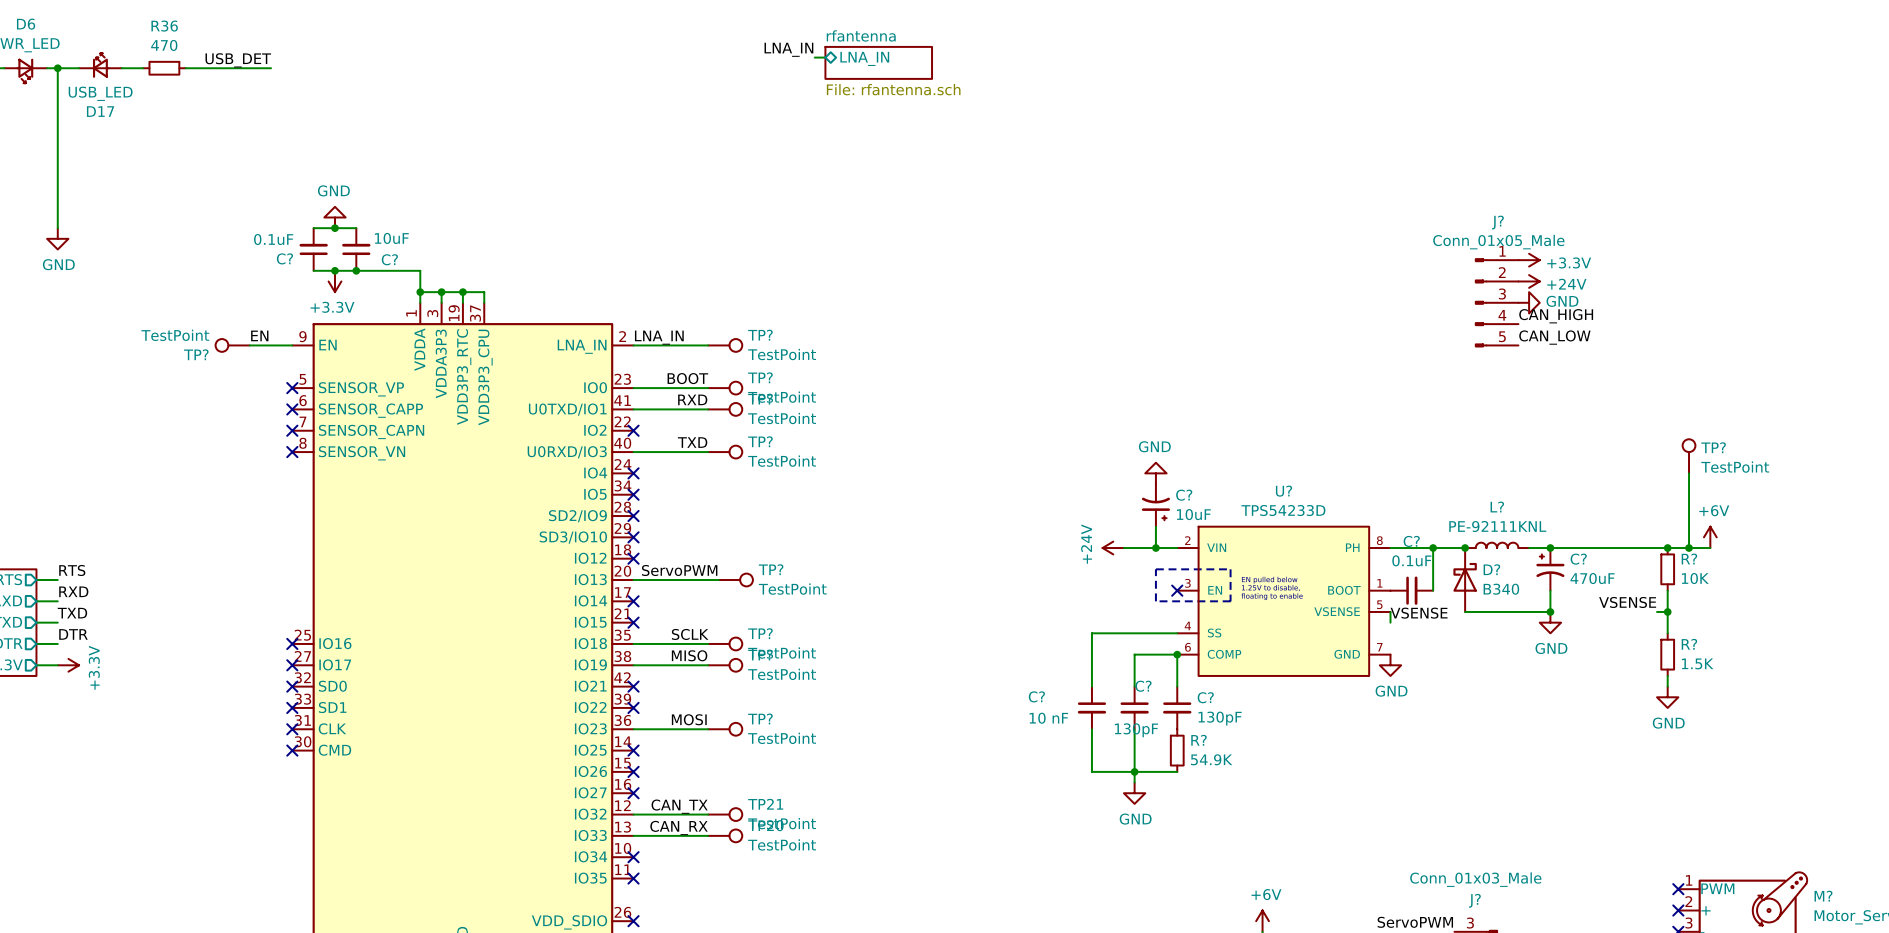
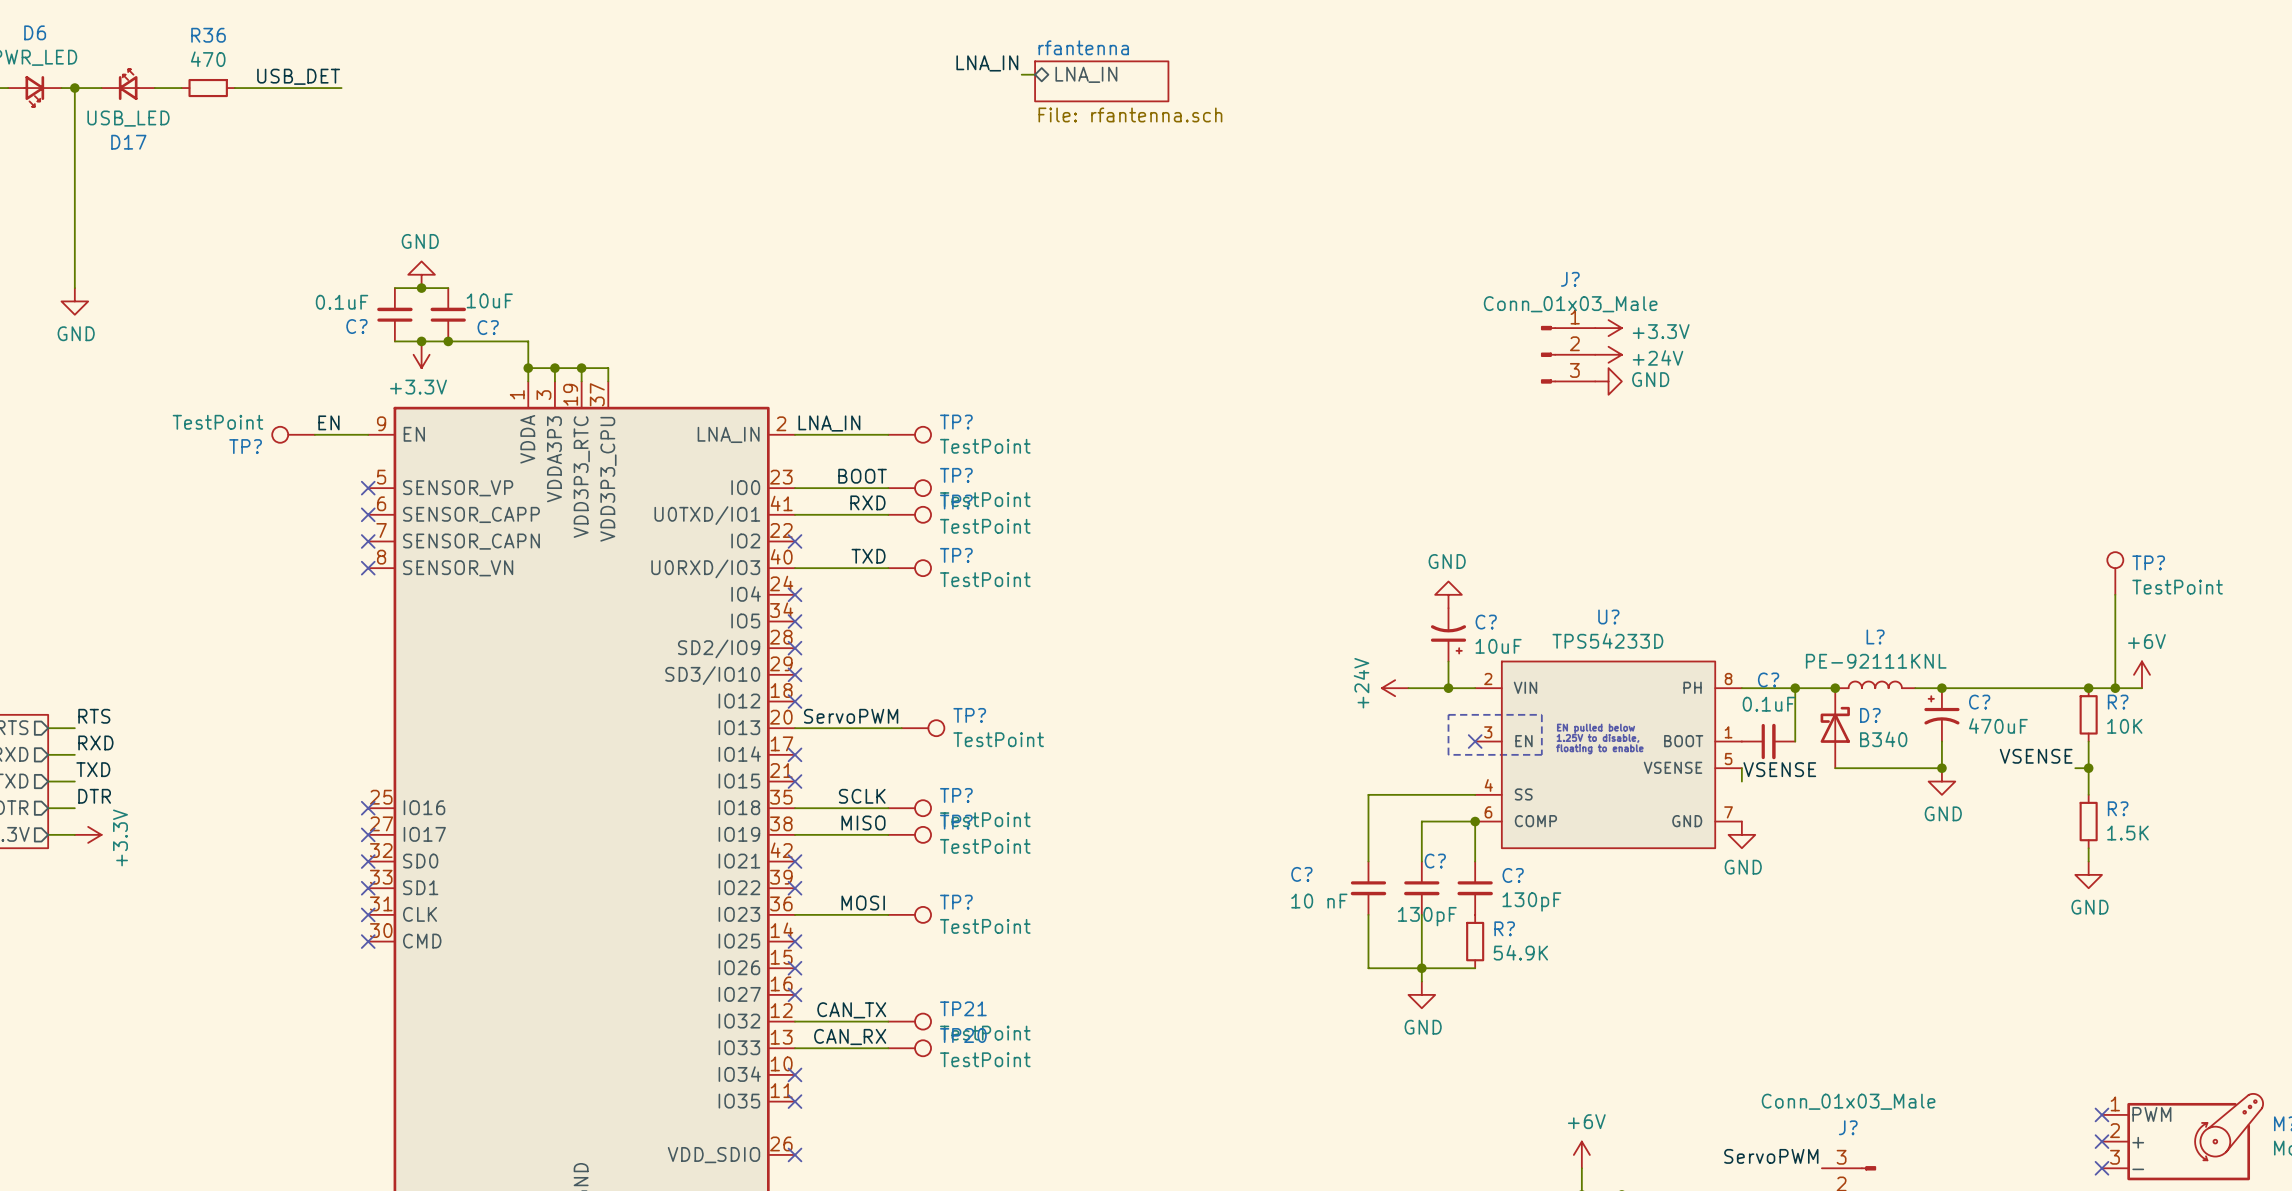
power symbol: none -> +3.3V (1608, 328)
power symbol: +3.3V (1529, 260) -> none
J?: none -> Conn_01x03_Male (1568, 354)
power symbol: none -> +24V (1608, 354)
power symbol: +24V (1529, 281) -> none
power symbol: none -> GND (1608, 381)
J?: Conn_01x05_Male (1496, 302) -> none
power symbol: GND (1529, 302) -> none
label: CAN_HIGH (1556, 316) -> none
label: CAN_LOW (1554, 337) -> none

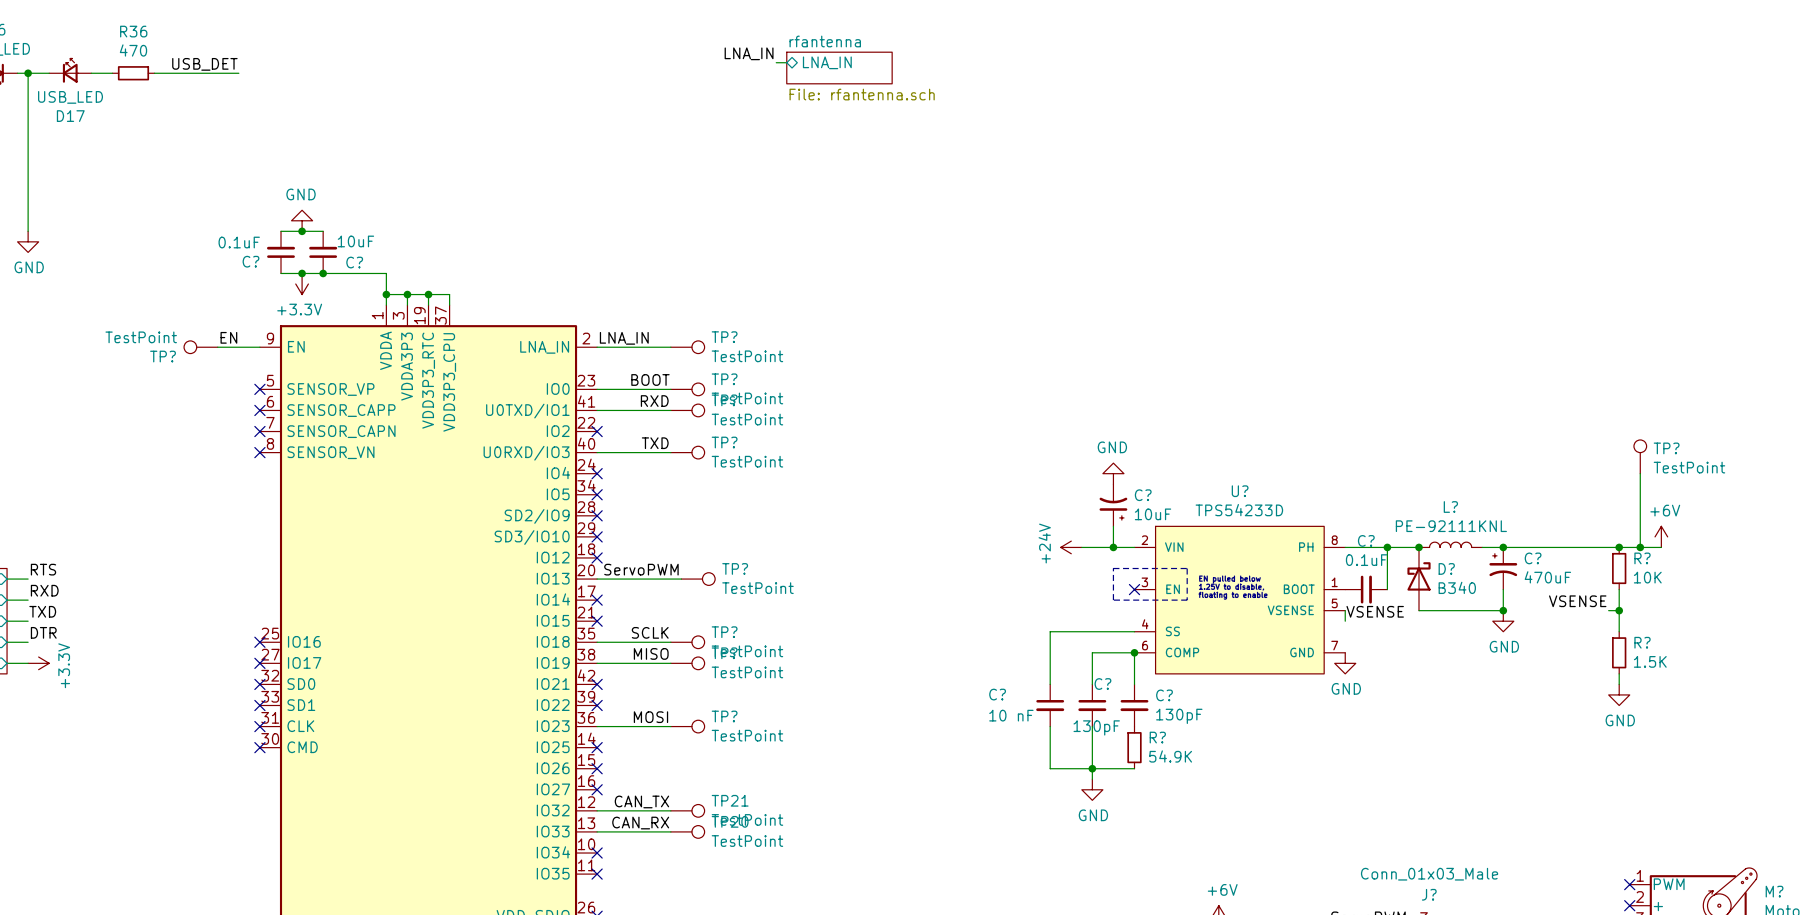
power symbol: +3.3V (1608, 328) -> none
J?: Conn_01x03_Male (1568, 354) -> none
power symbol: +24V (1608, 354) -> none
power symbol: GND (1608, 381) -> none

